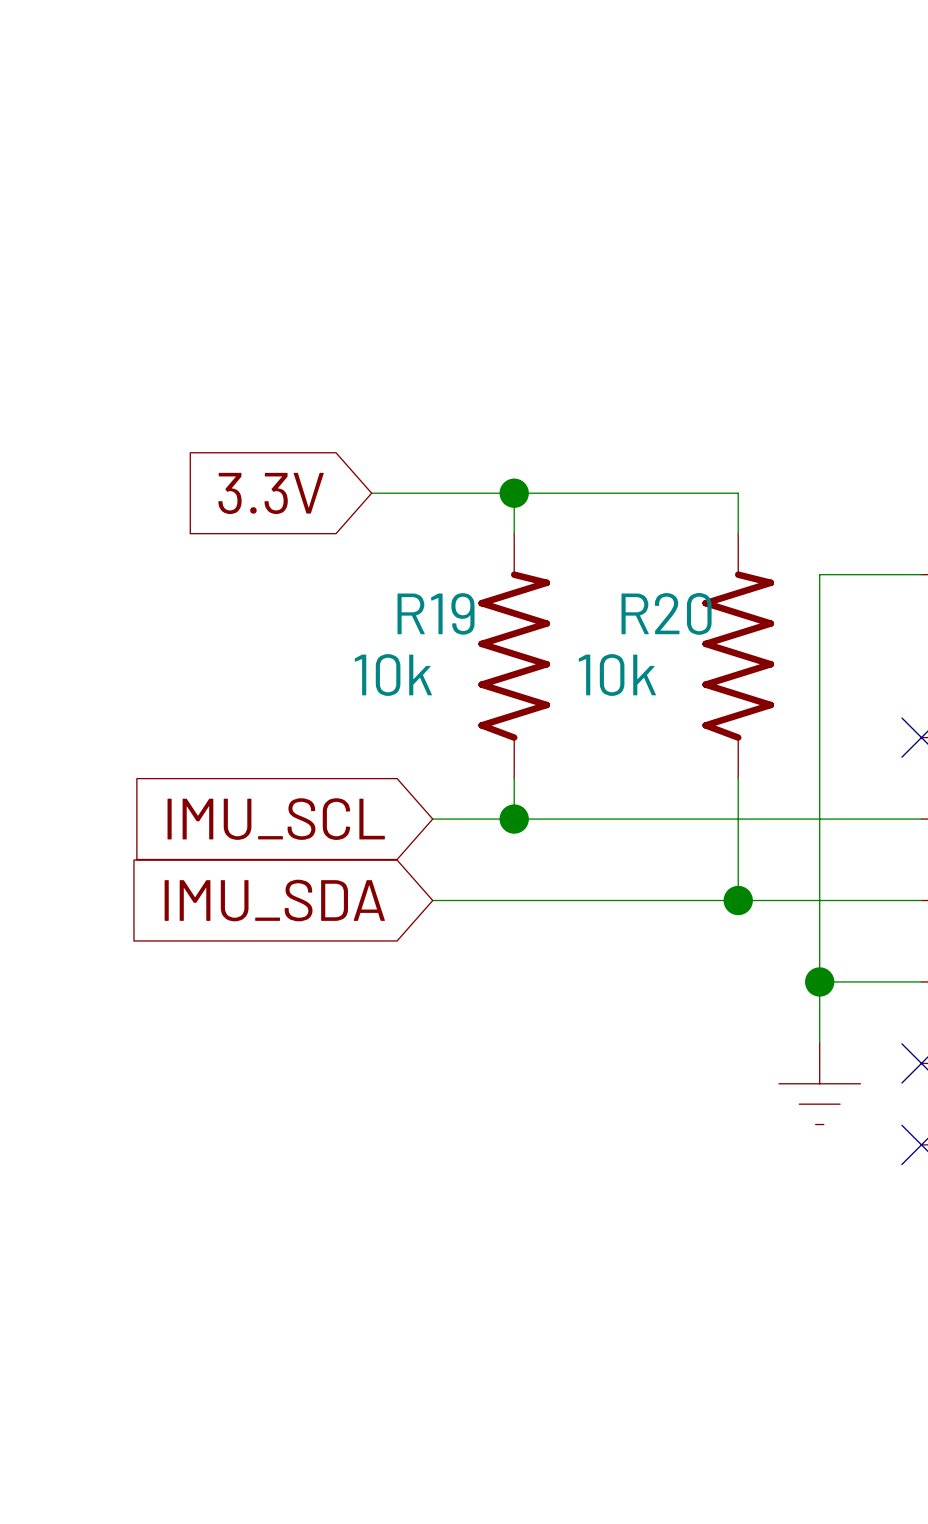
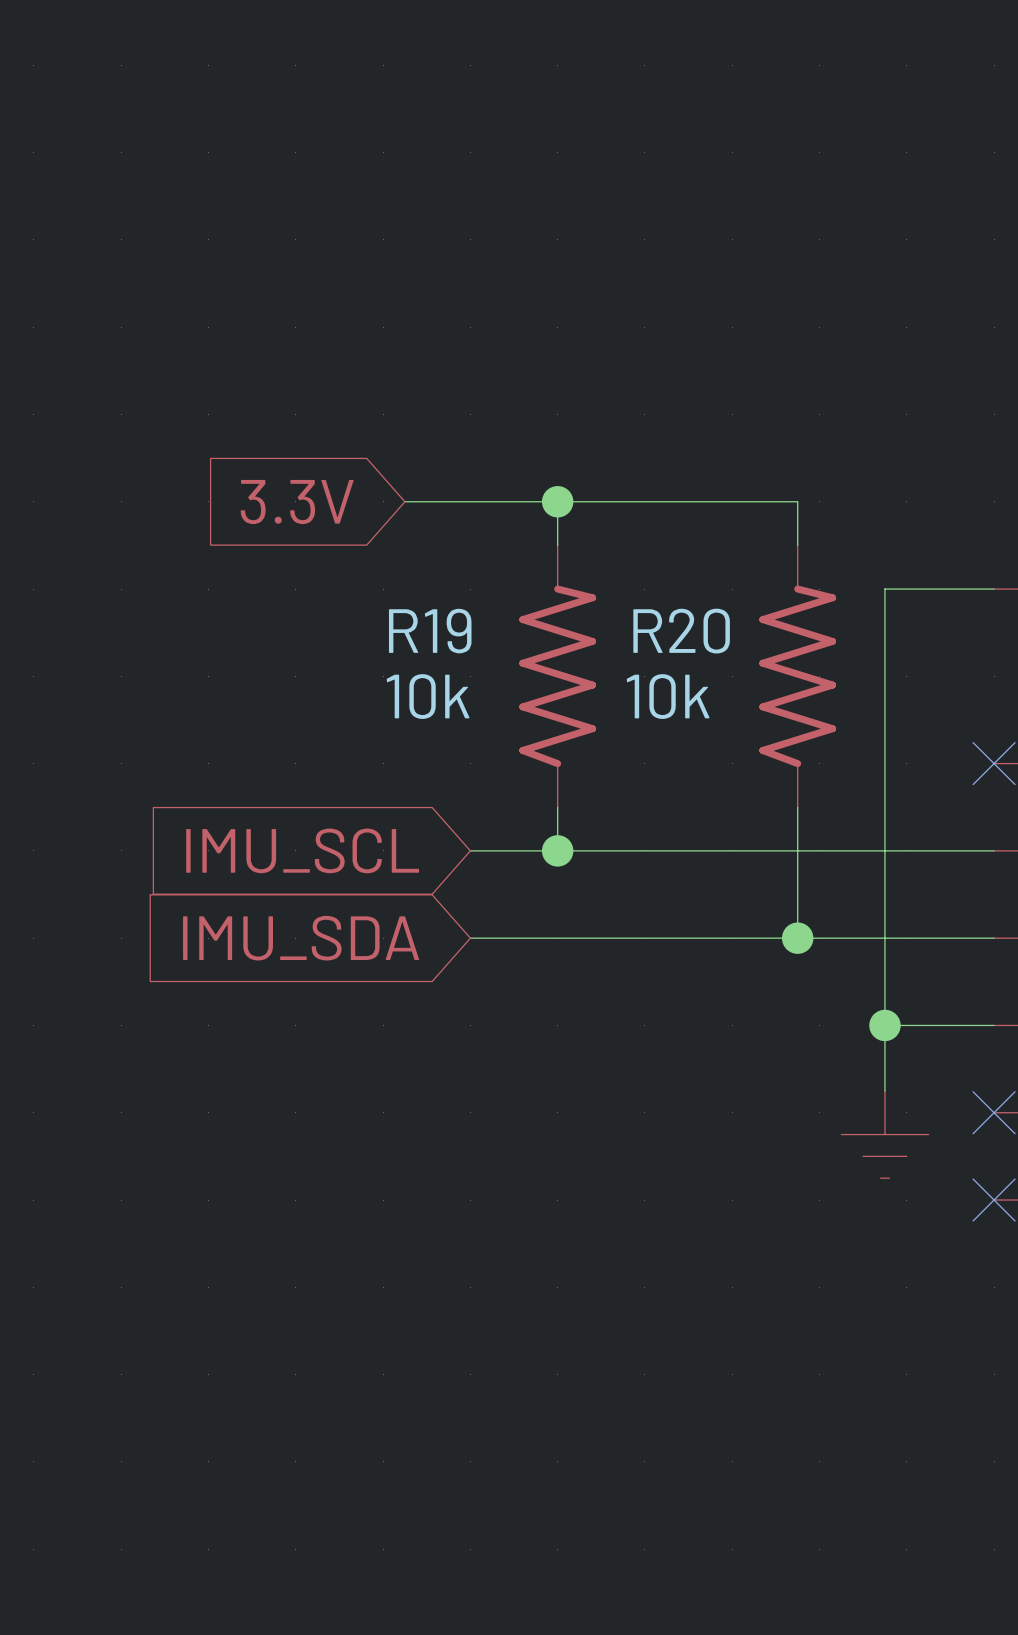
R19 name position: R19 (436, 613) -> R19 (430, 631)
R20 name position: R20 (666, 613) -> R20 (681, 631)

